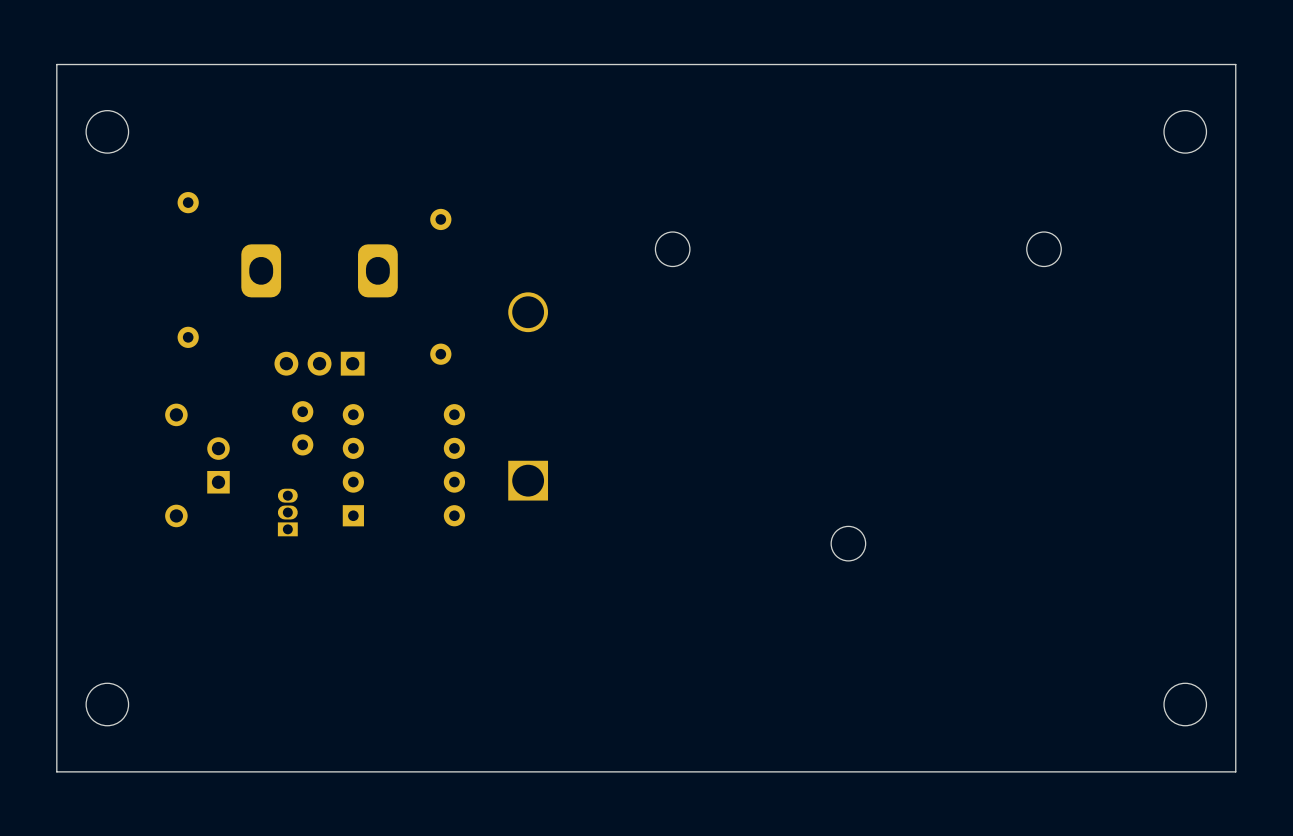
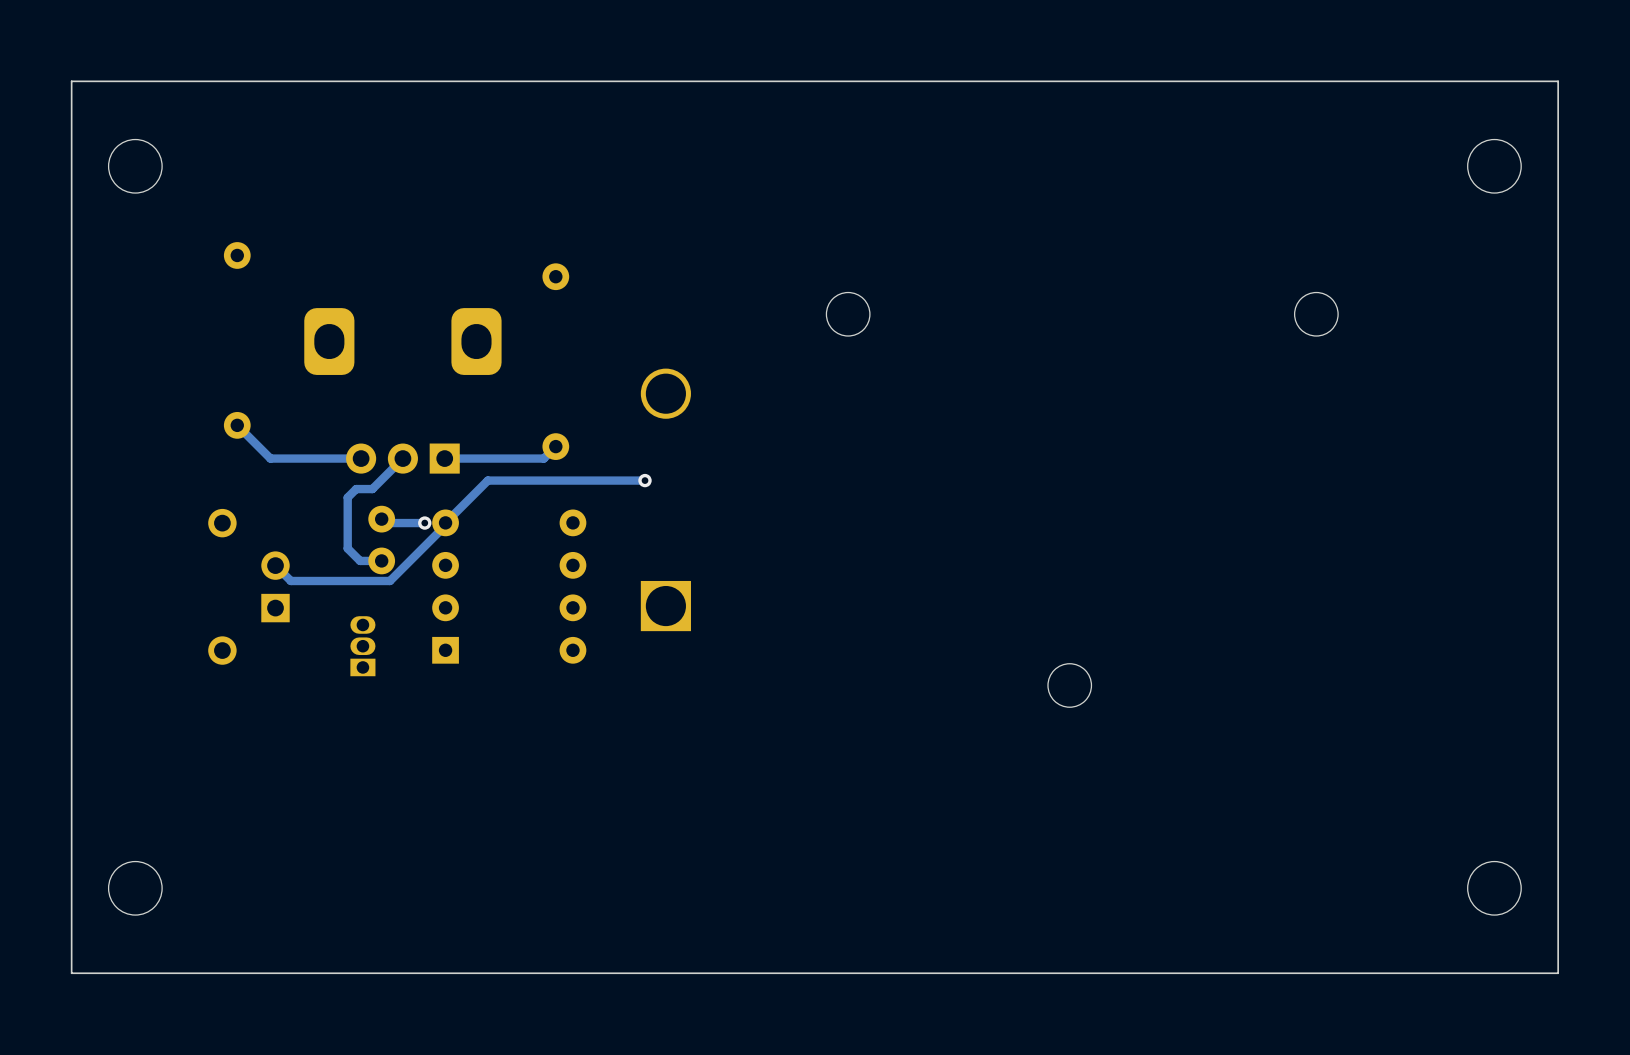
track: none -> (237, 425) (270, 458) (361, 458)
track: none -> (555, 446) (543, 458) (444, 458) (456, 446)
track: none -> (402, 458) (372, 489) (356, 489) (347, 497) (347, 548) (360, 560) (381, 560)
track: none -> (645, 480) (487, 480) (389, 580) (290, 580) (275, 565)
via: none -> (645, 480)
track: none -> (381, 519) (385, 523) (424, 523)
via: none -> (424, 523)

